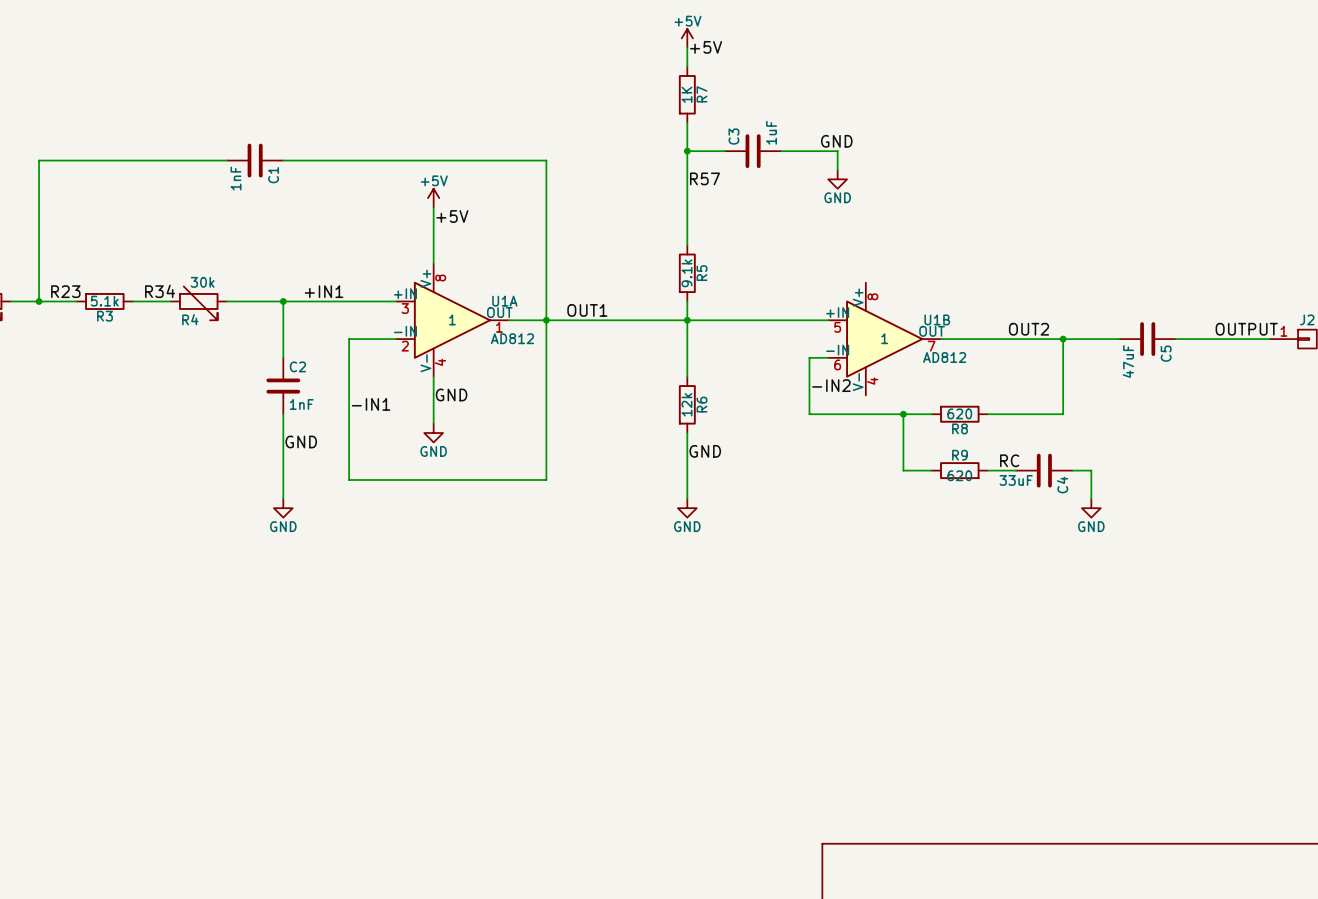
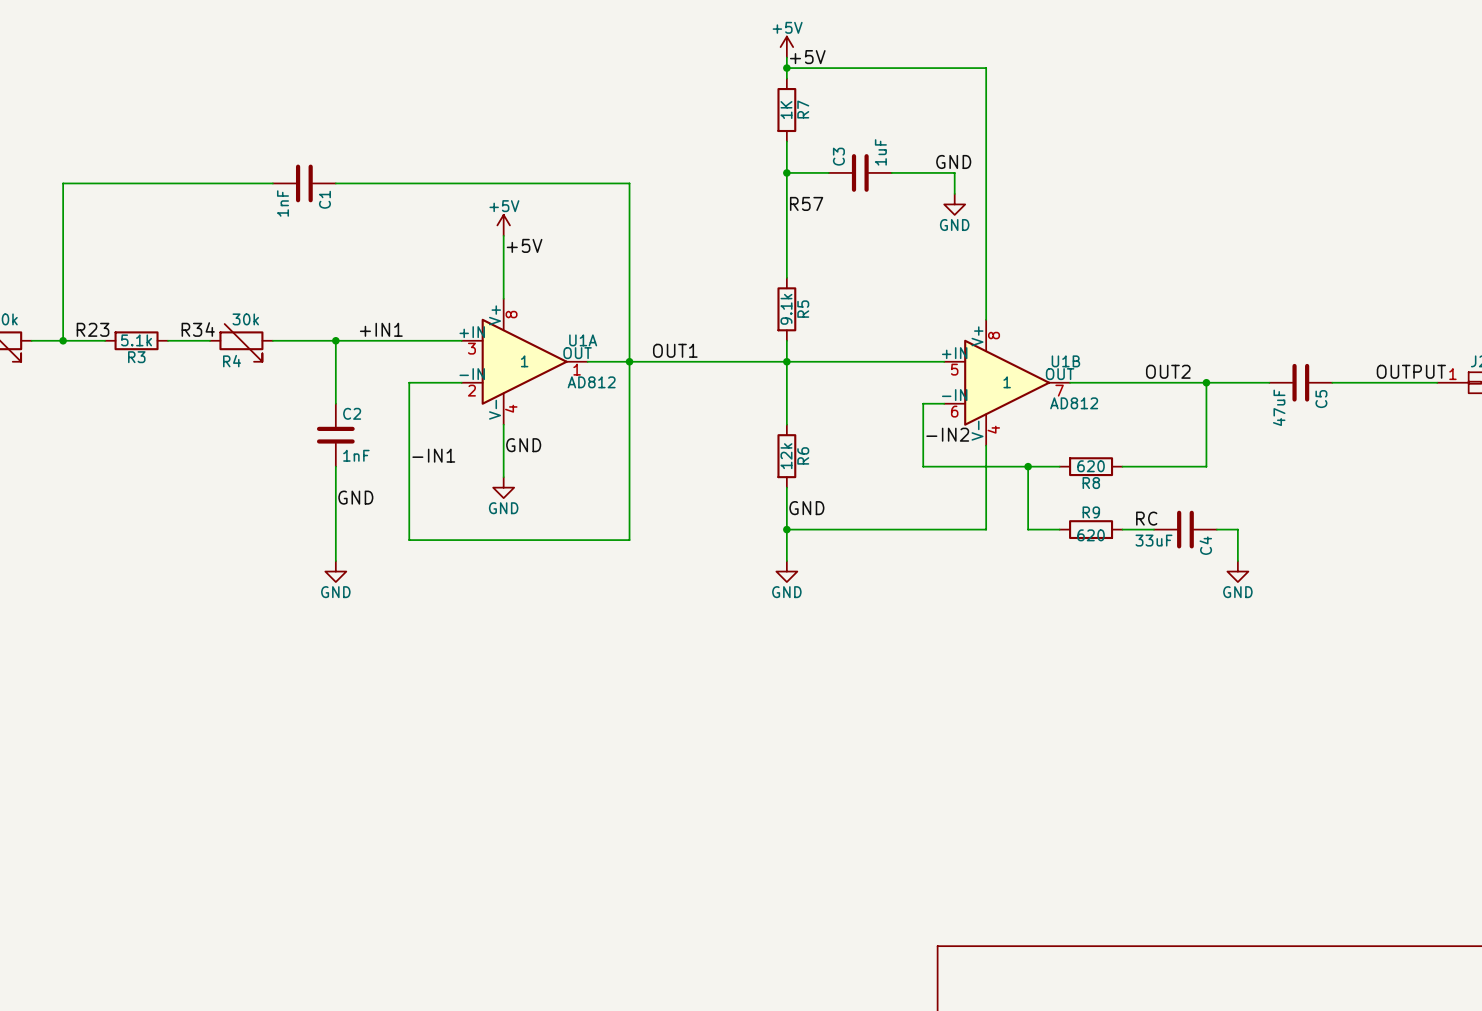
wire: none -> (786, 68) (986, 68) (986, 319)
junction: none -> (786, 68)
wire: none -> (986, 445) (986, 529) (786, 529)
junction: none -> (786, 529)

